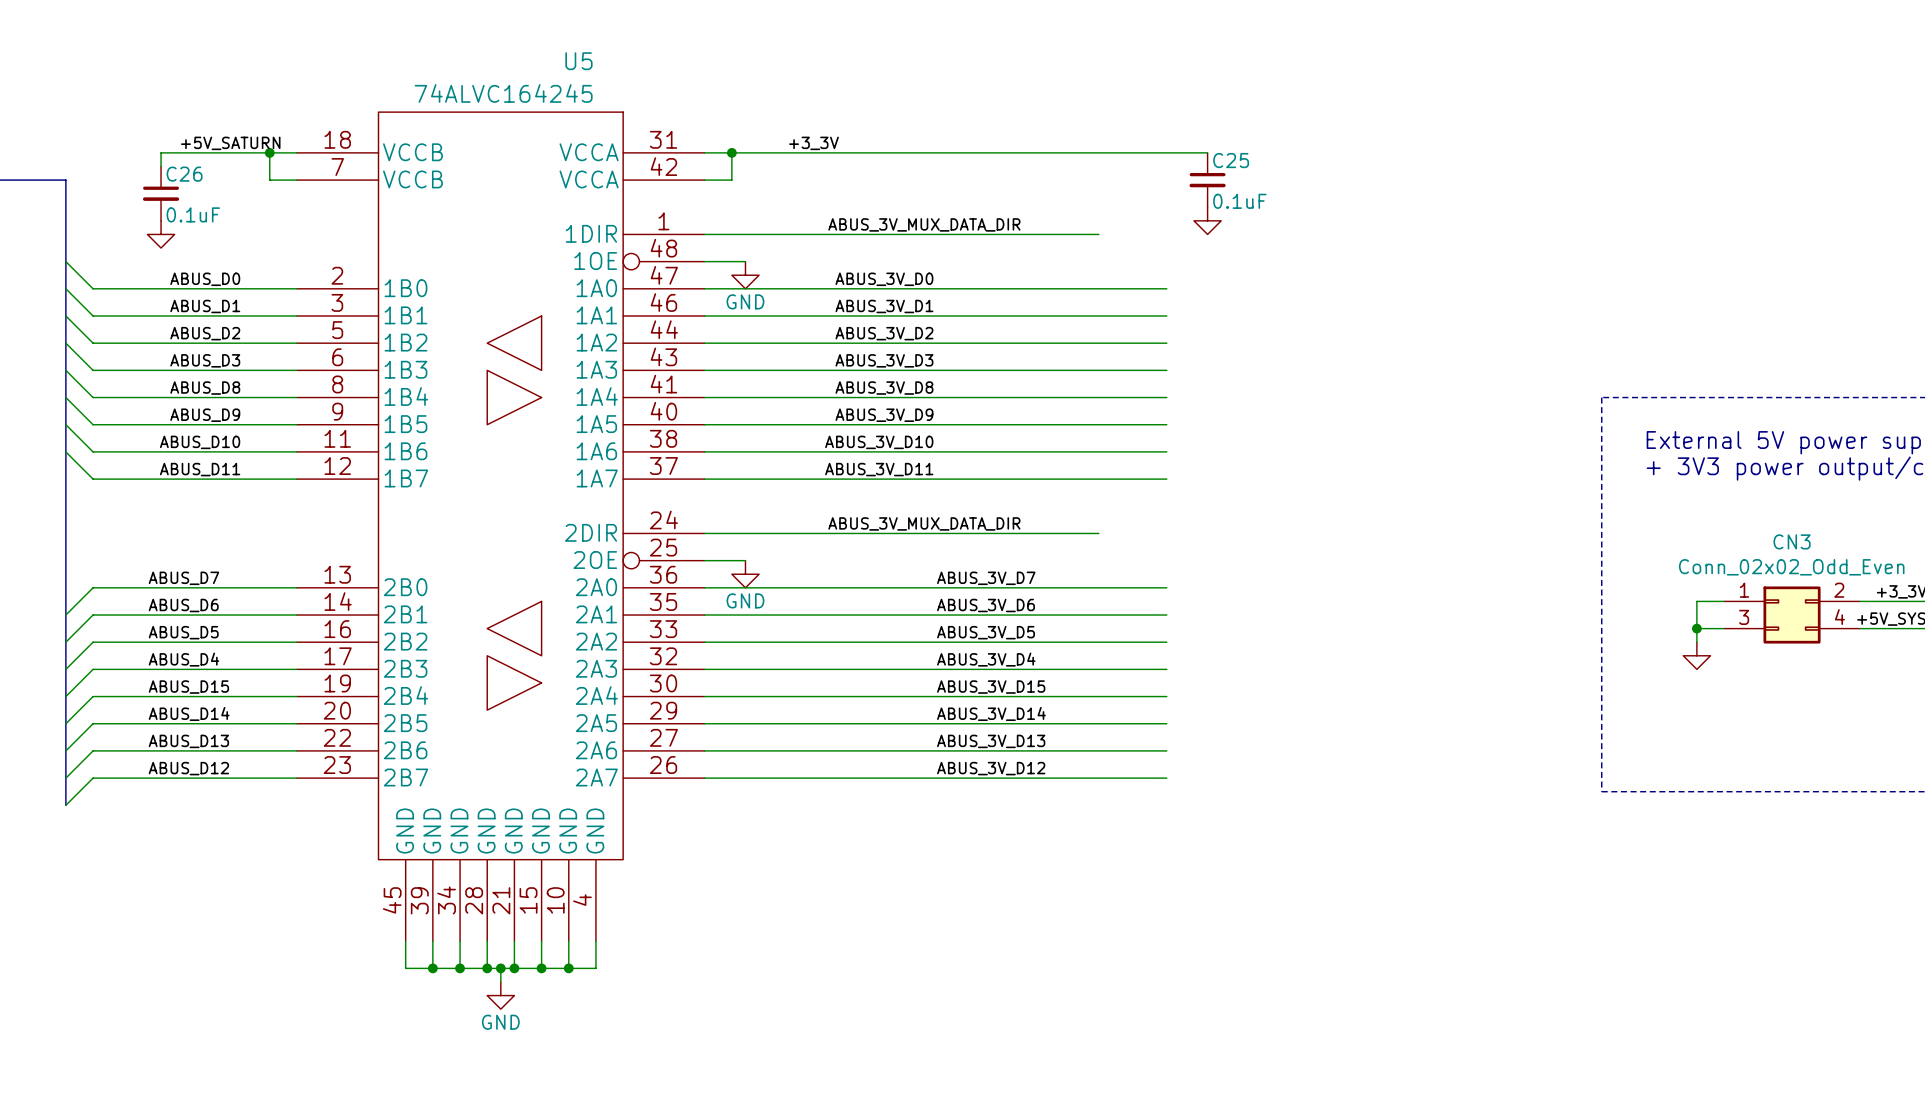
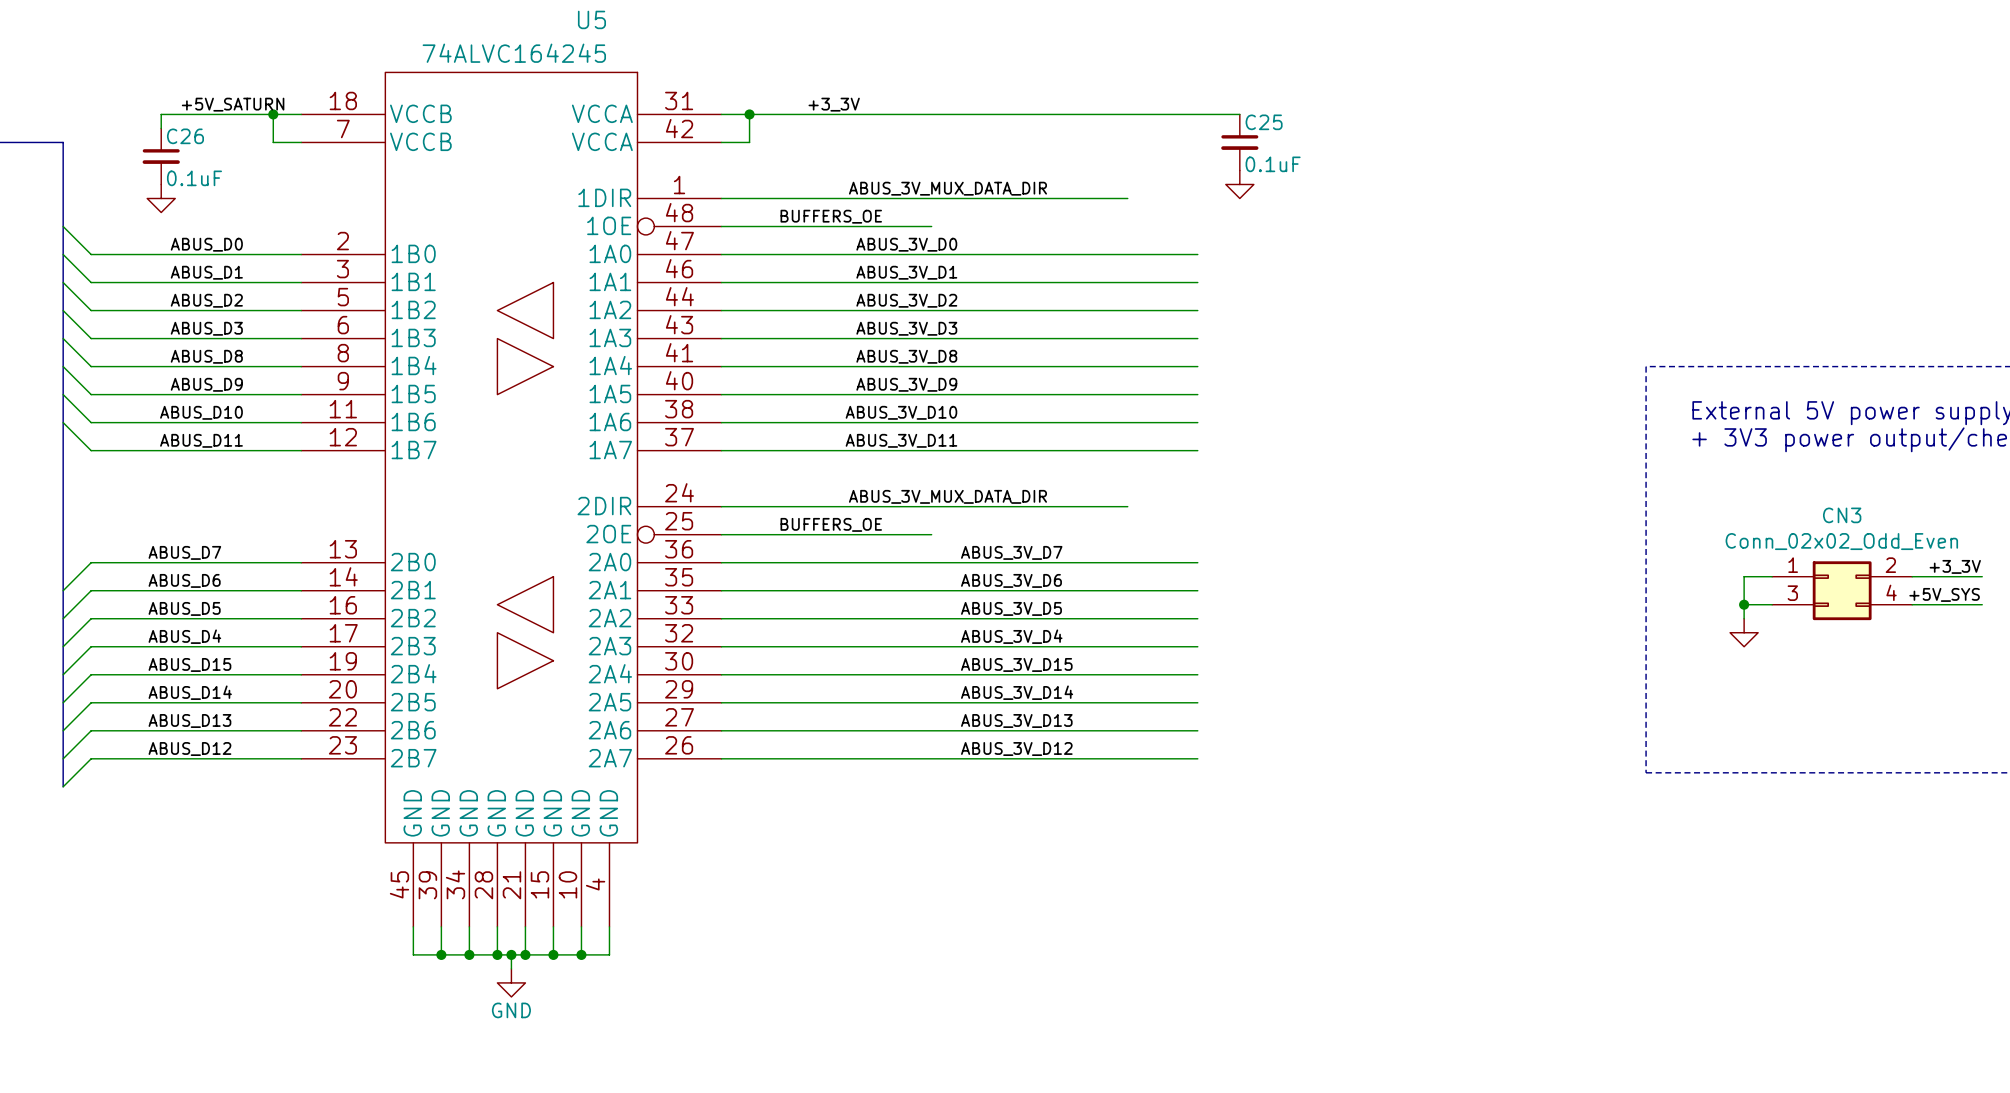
label: none -> BUFFERS_OE (831, 216)
wire: none -> (763, 226) (931, 226)
power symbol: GND (745, 275) -> none
label: none -> BUFFERS_OE (831, 524)
wire: none -> (763, 534) (931, 534)
power symbol: GND (745, 574) -> none

